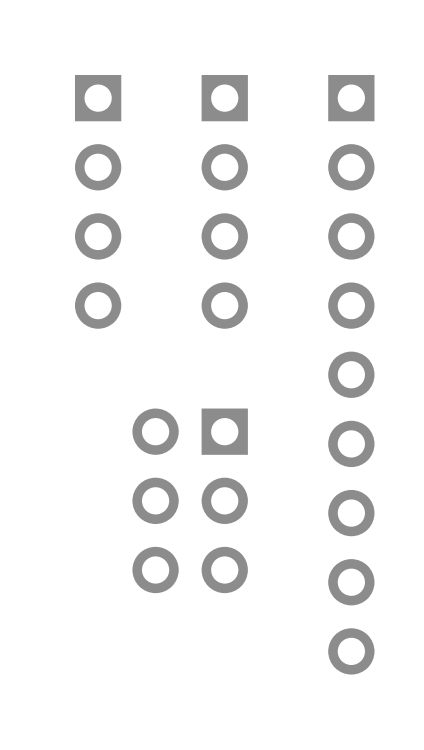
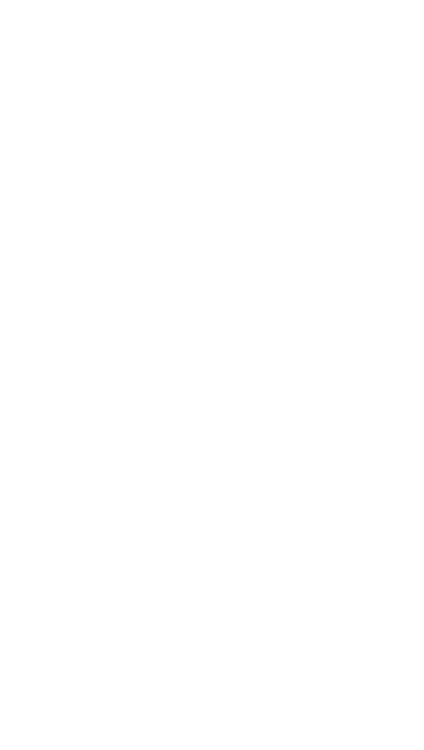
part: (98, 201) -> none
part: (224, 201) -> none
part: (351, 374) -> none
part: (190, 500) -> none

